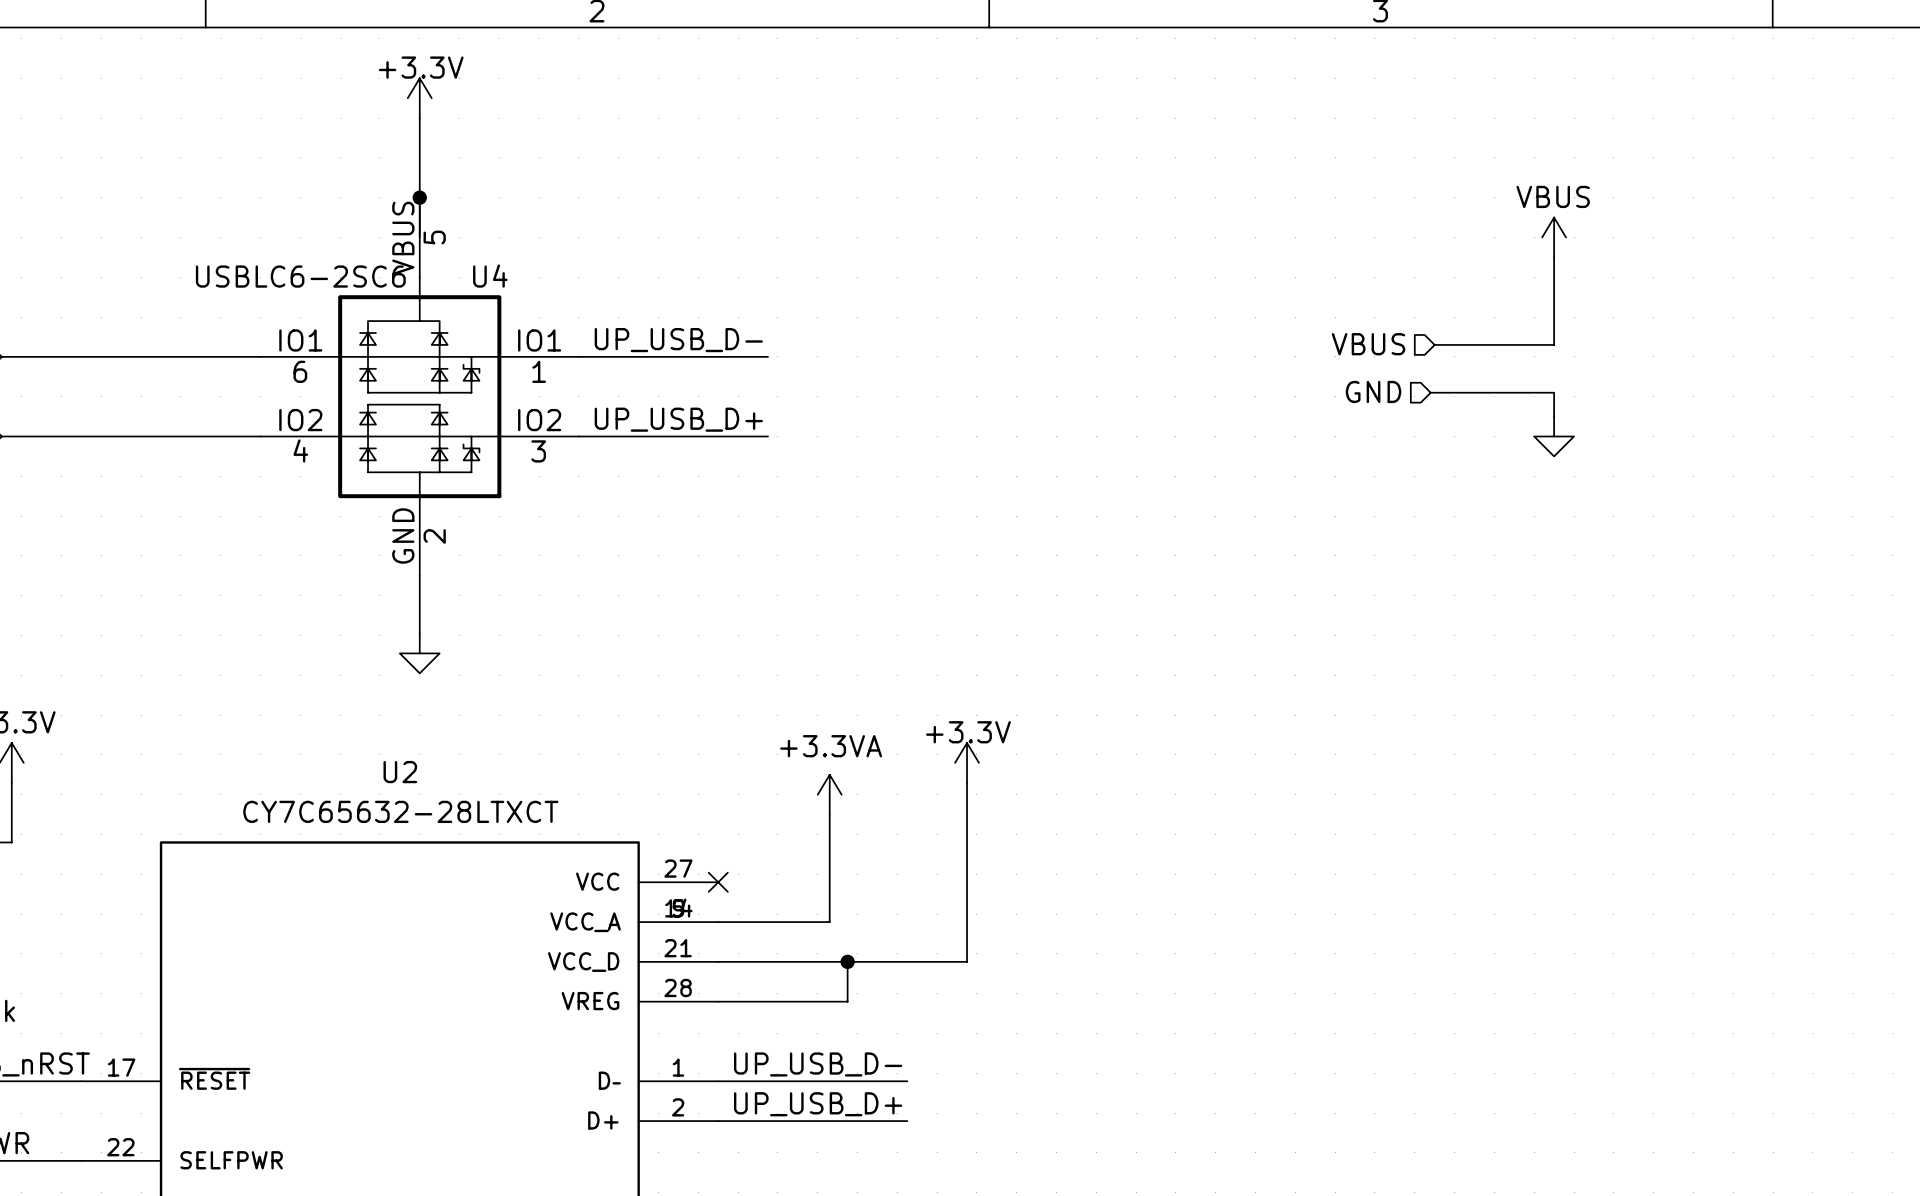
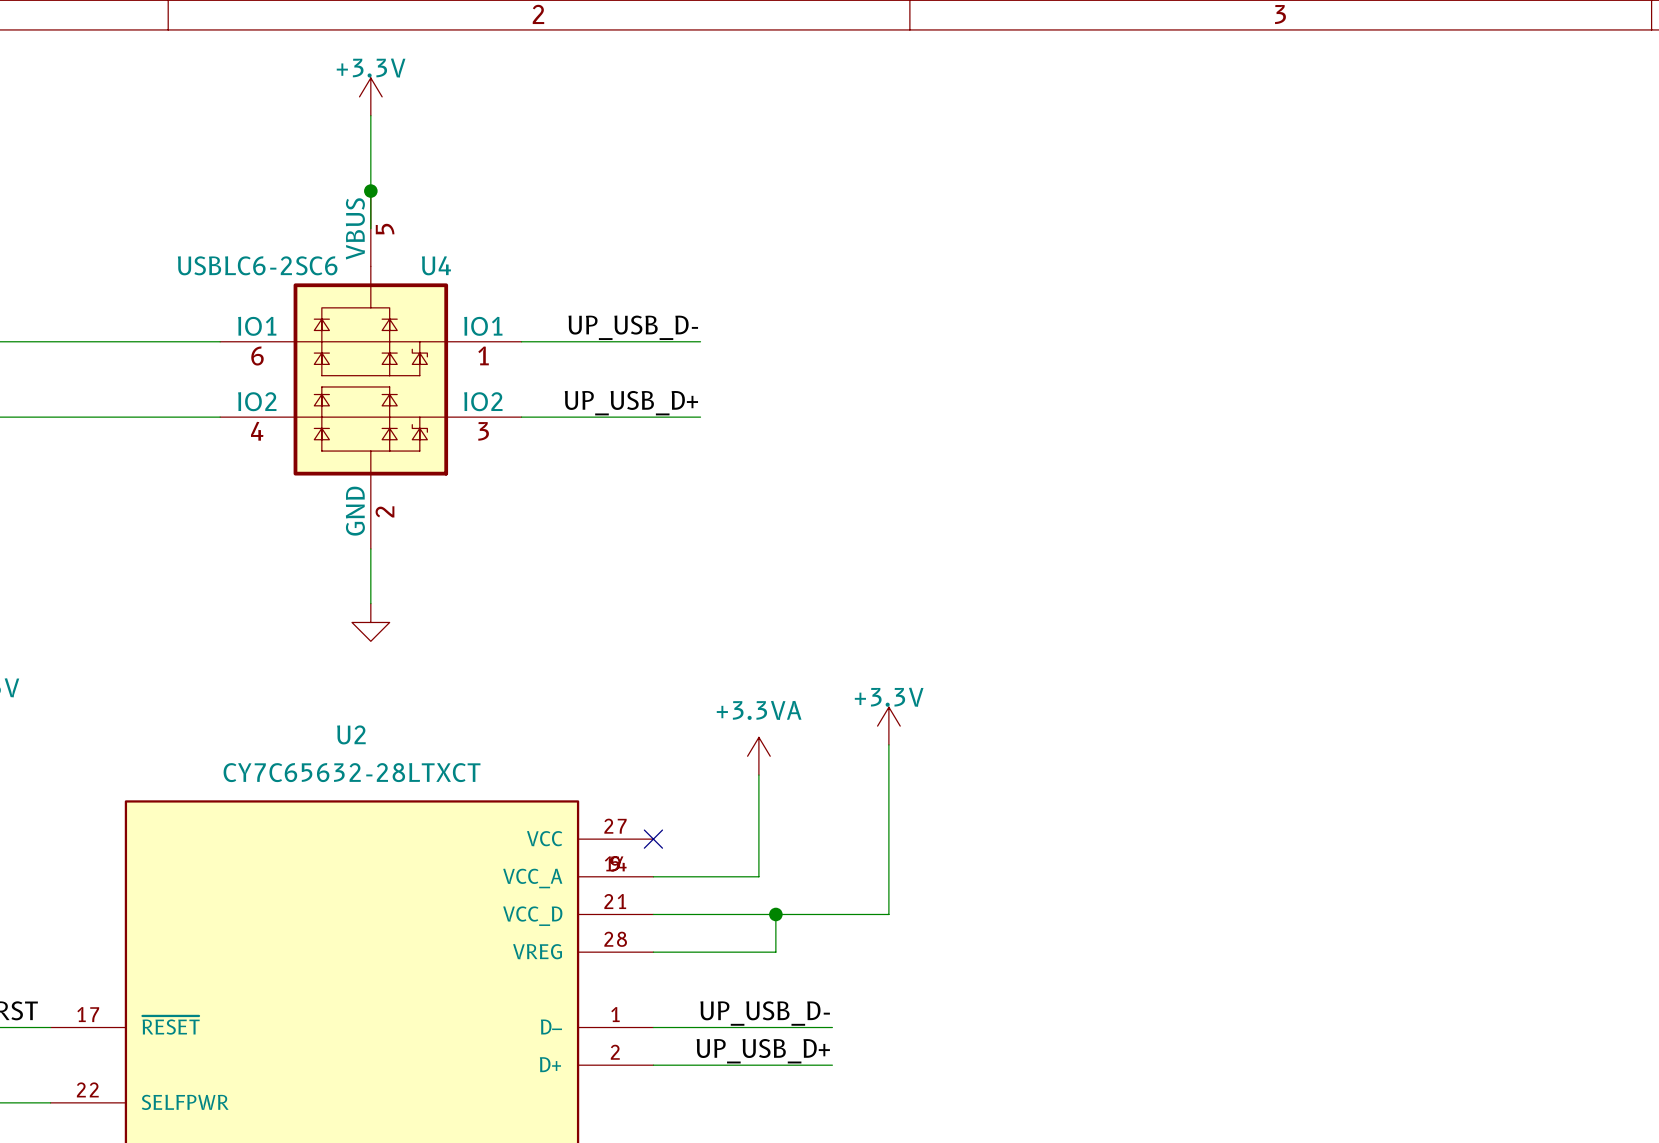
power symbol: VBUS (1554, 237) -> none
wire: (1554, 257) (1554, 344) (1434, 344) -> none
hierarchical label: VBUS (1368, 344) -> none
hierarchical label: GND (1373, 391) -> none
wire: (1430, 392) (1554, 392) (1554, 416) -> none
power symbol: (1554, 436) -> none

